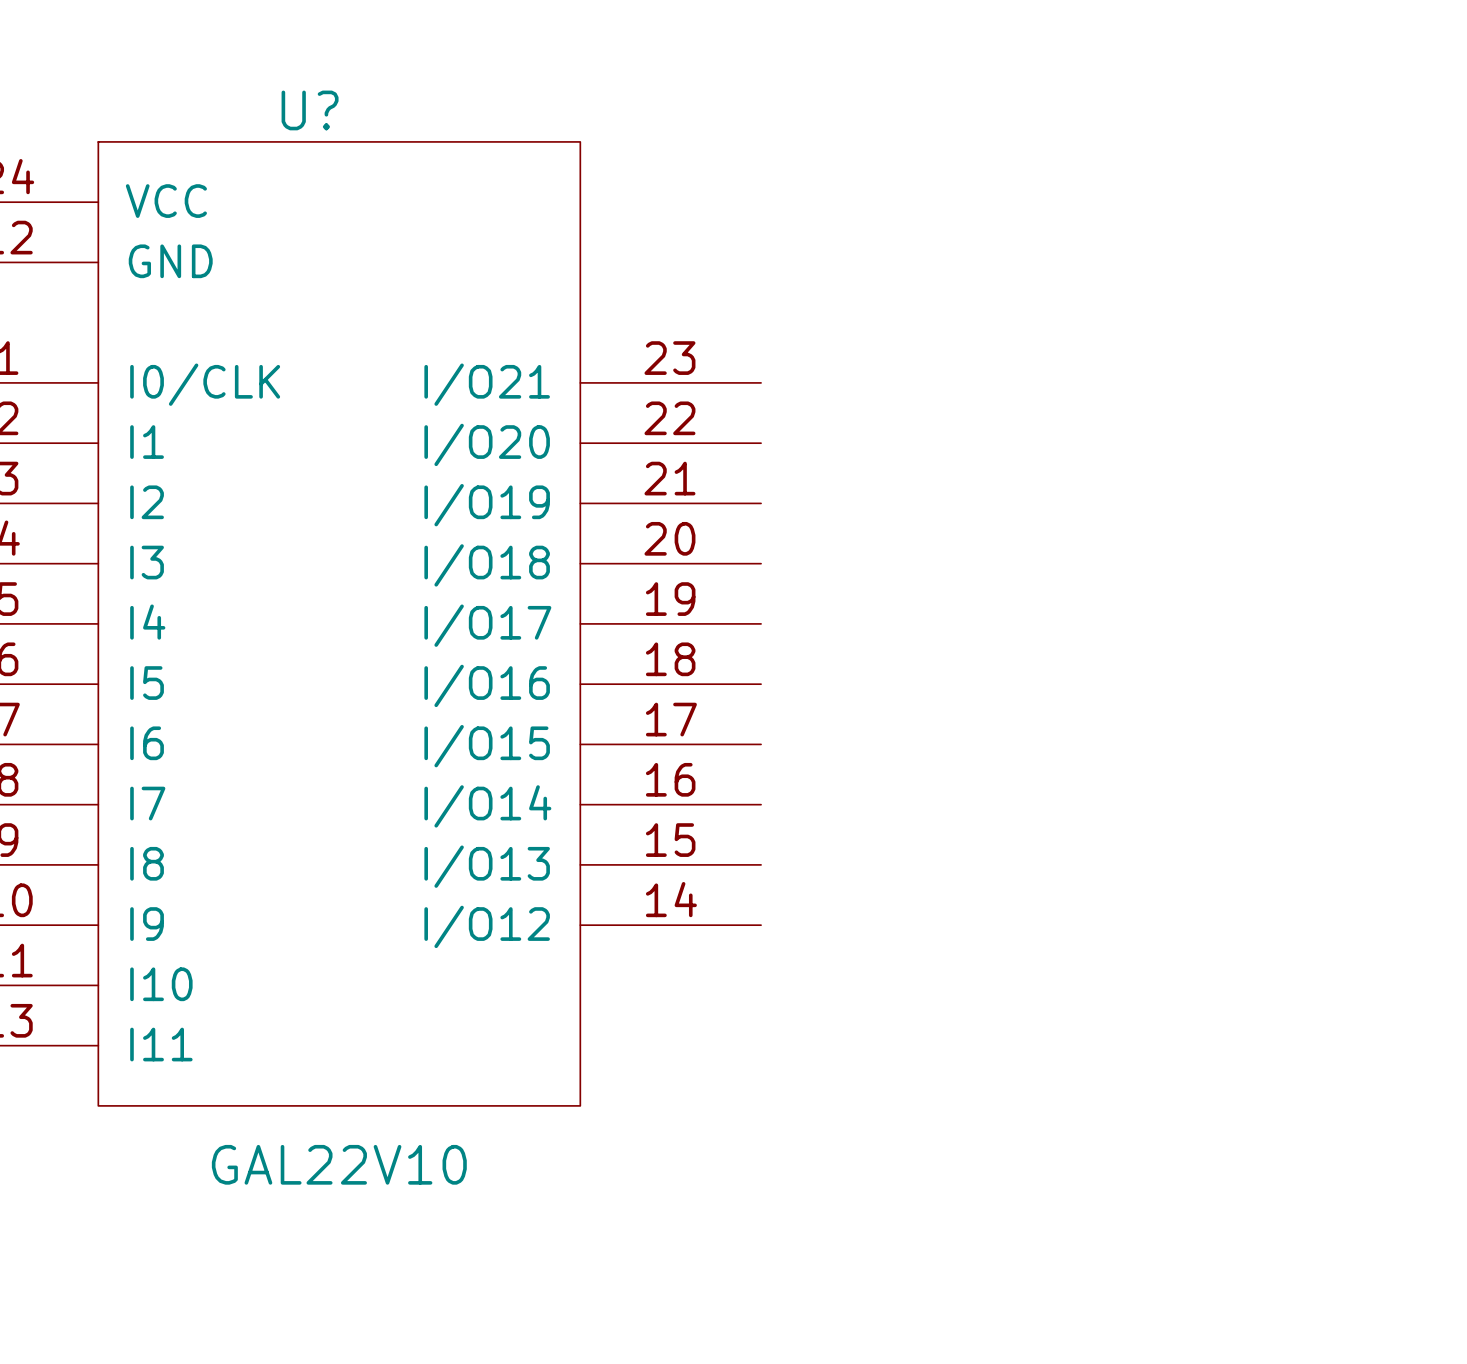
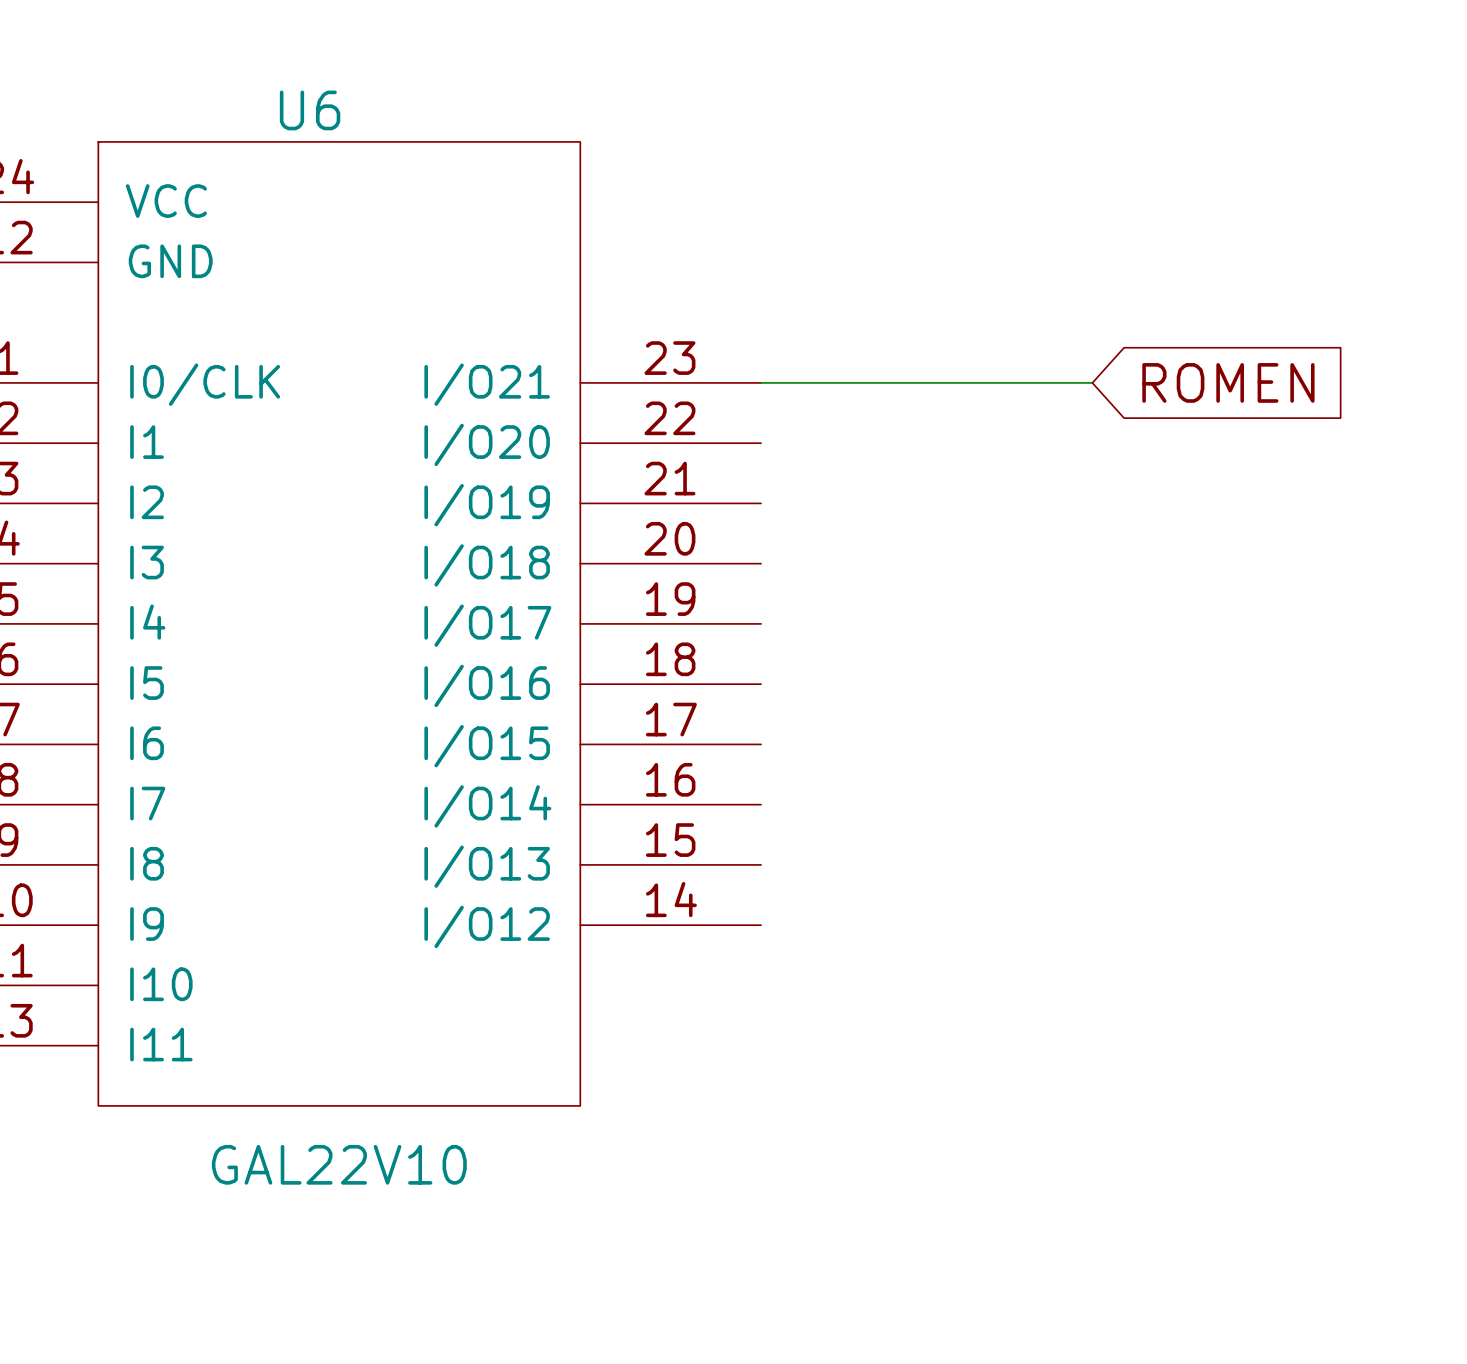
U? name: U? (310, 110) -> U6 (310, 110)
wire: none -> (761, 382) (1092, 382)
global label: none -> ROMEN (1228, 382)

